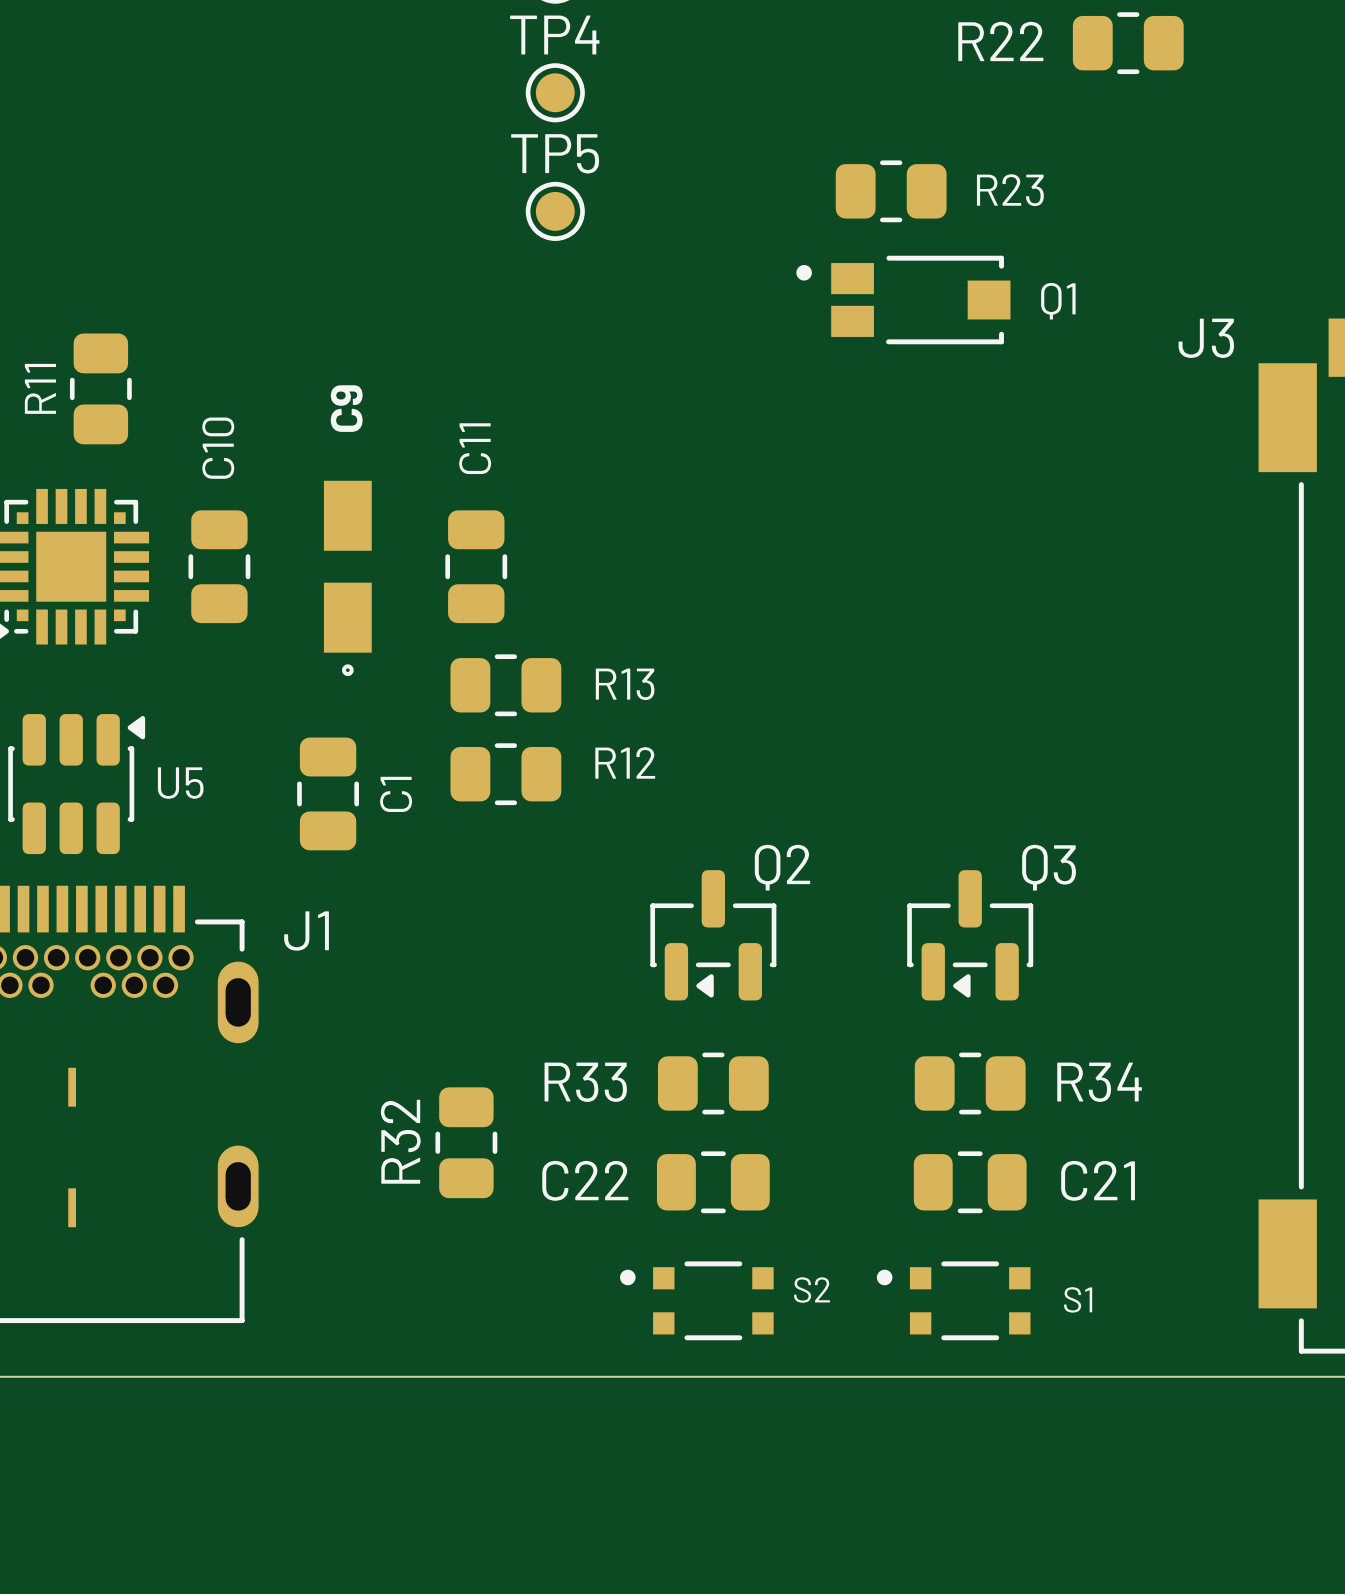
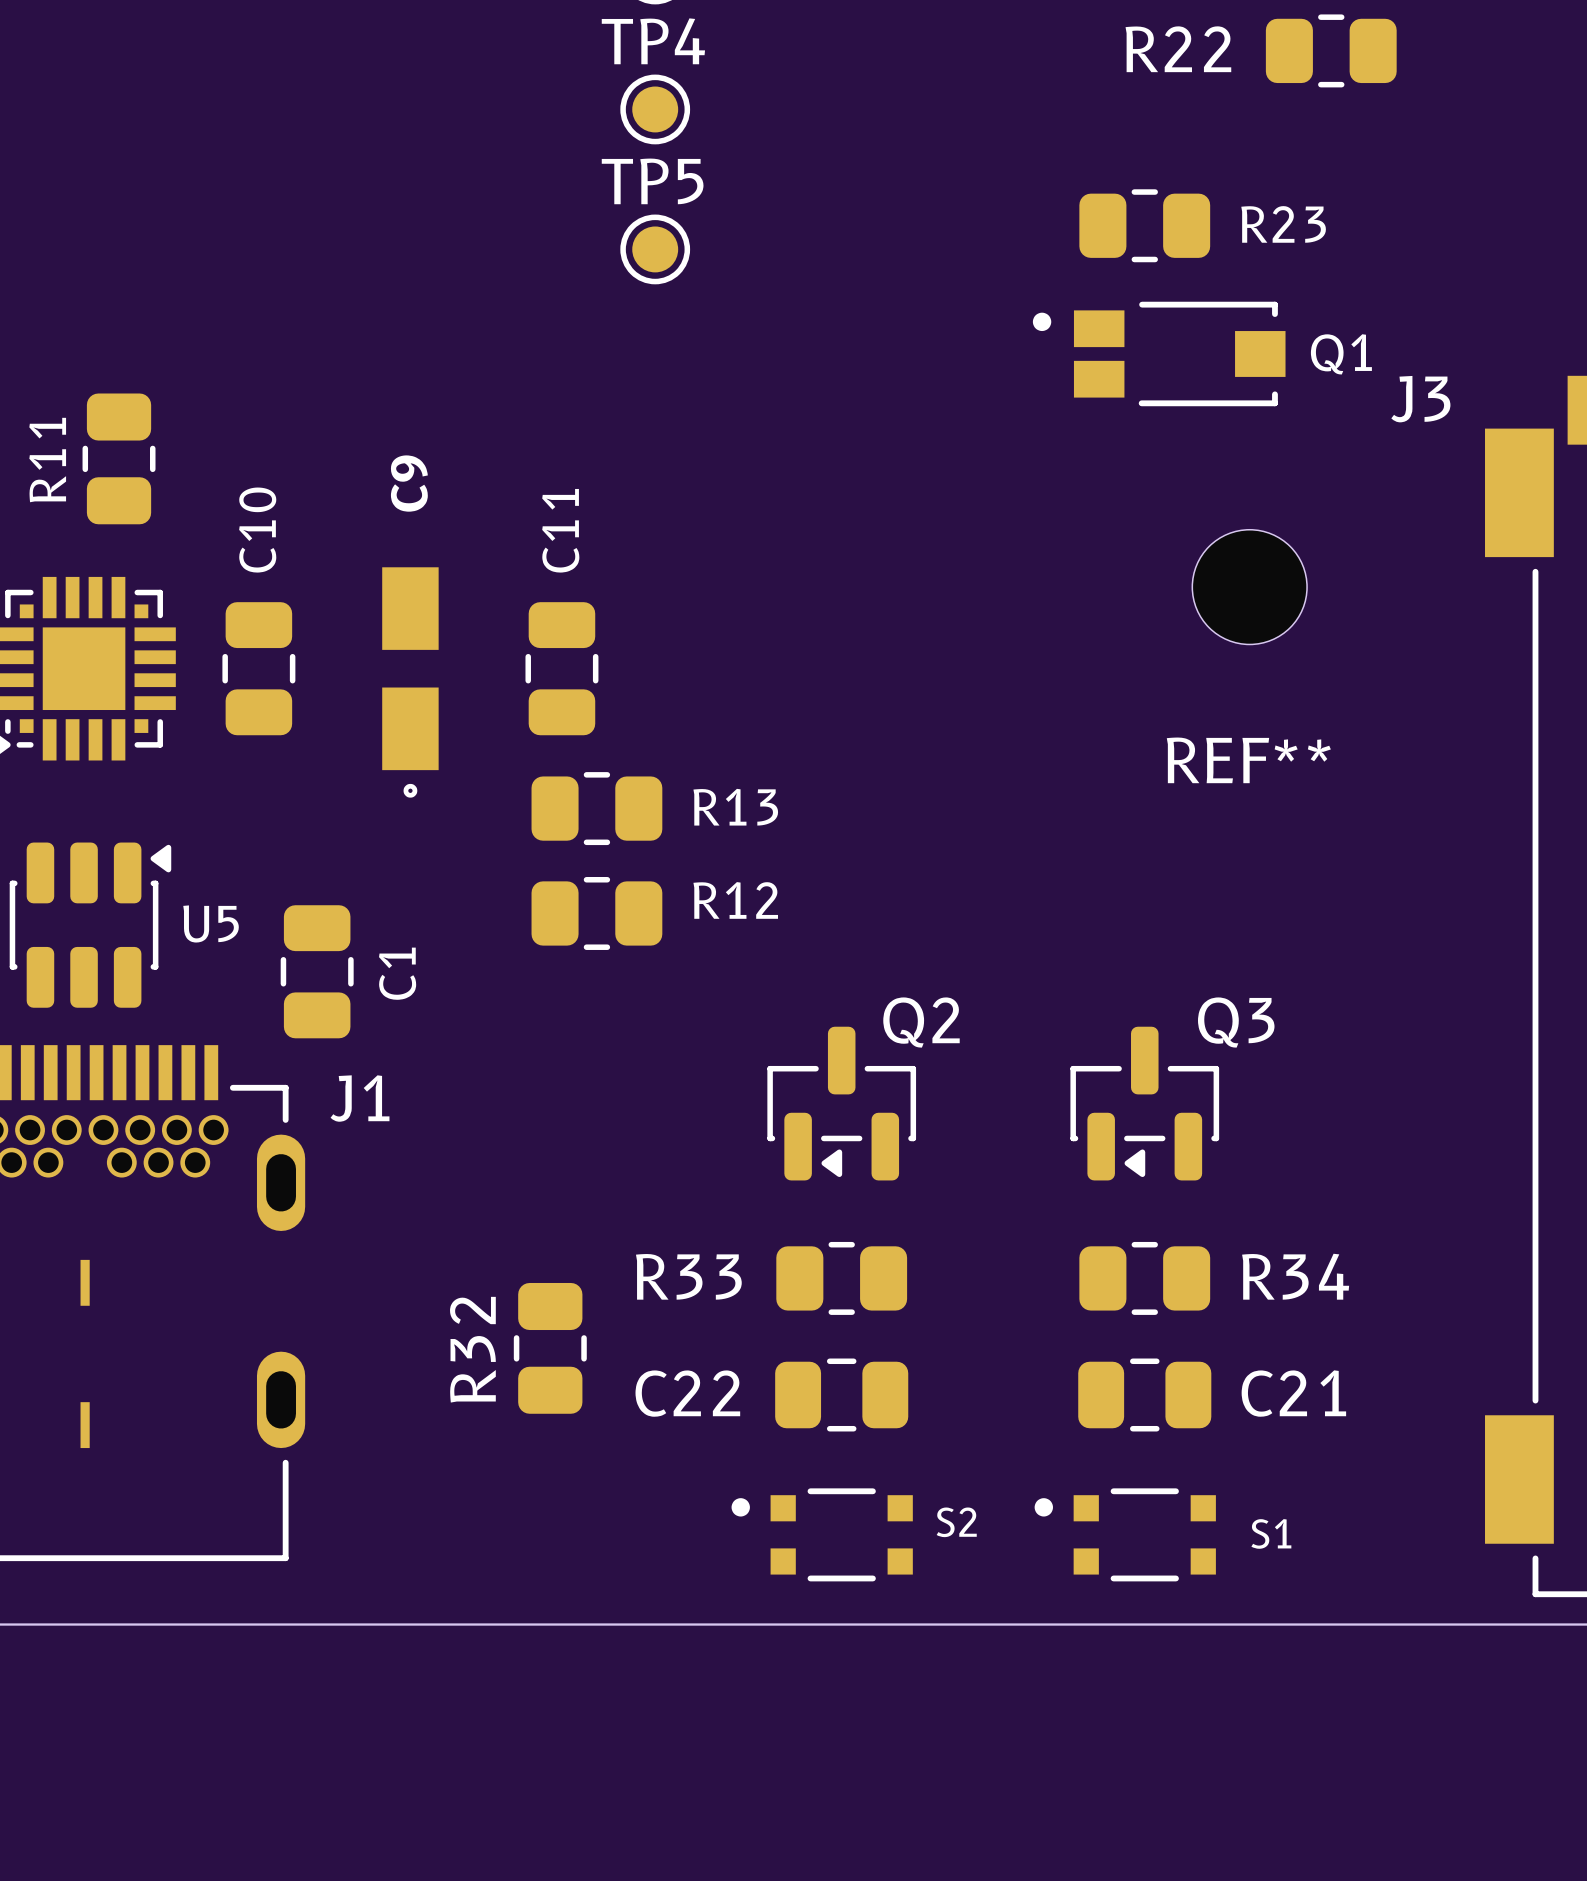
R23 position: (891, 191) -> (1144, 225)
Q1 position: (903, 300) -> (1159, 353)
REF**: none -> (1249, 587)
C1 position: (328, 793) -> (317, 971)

